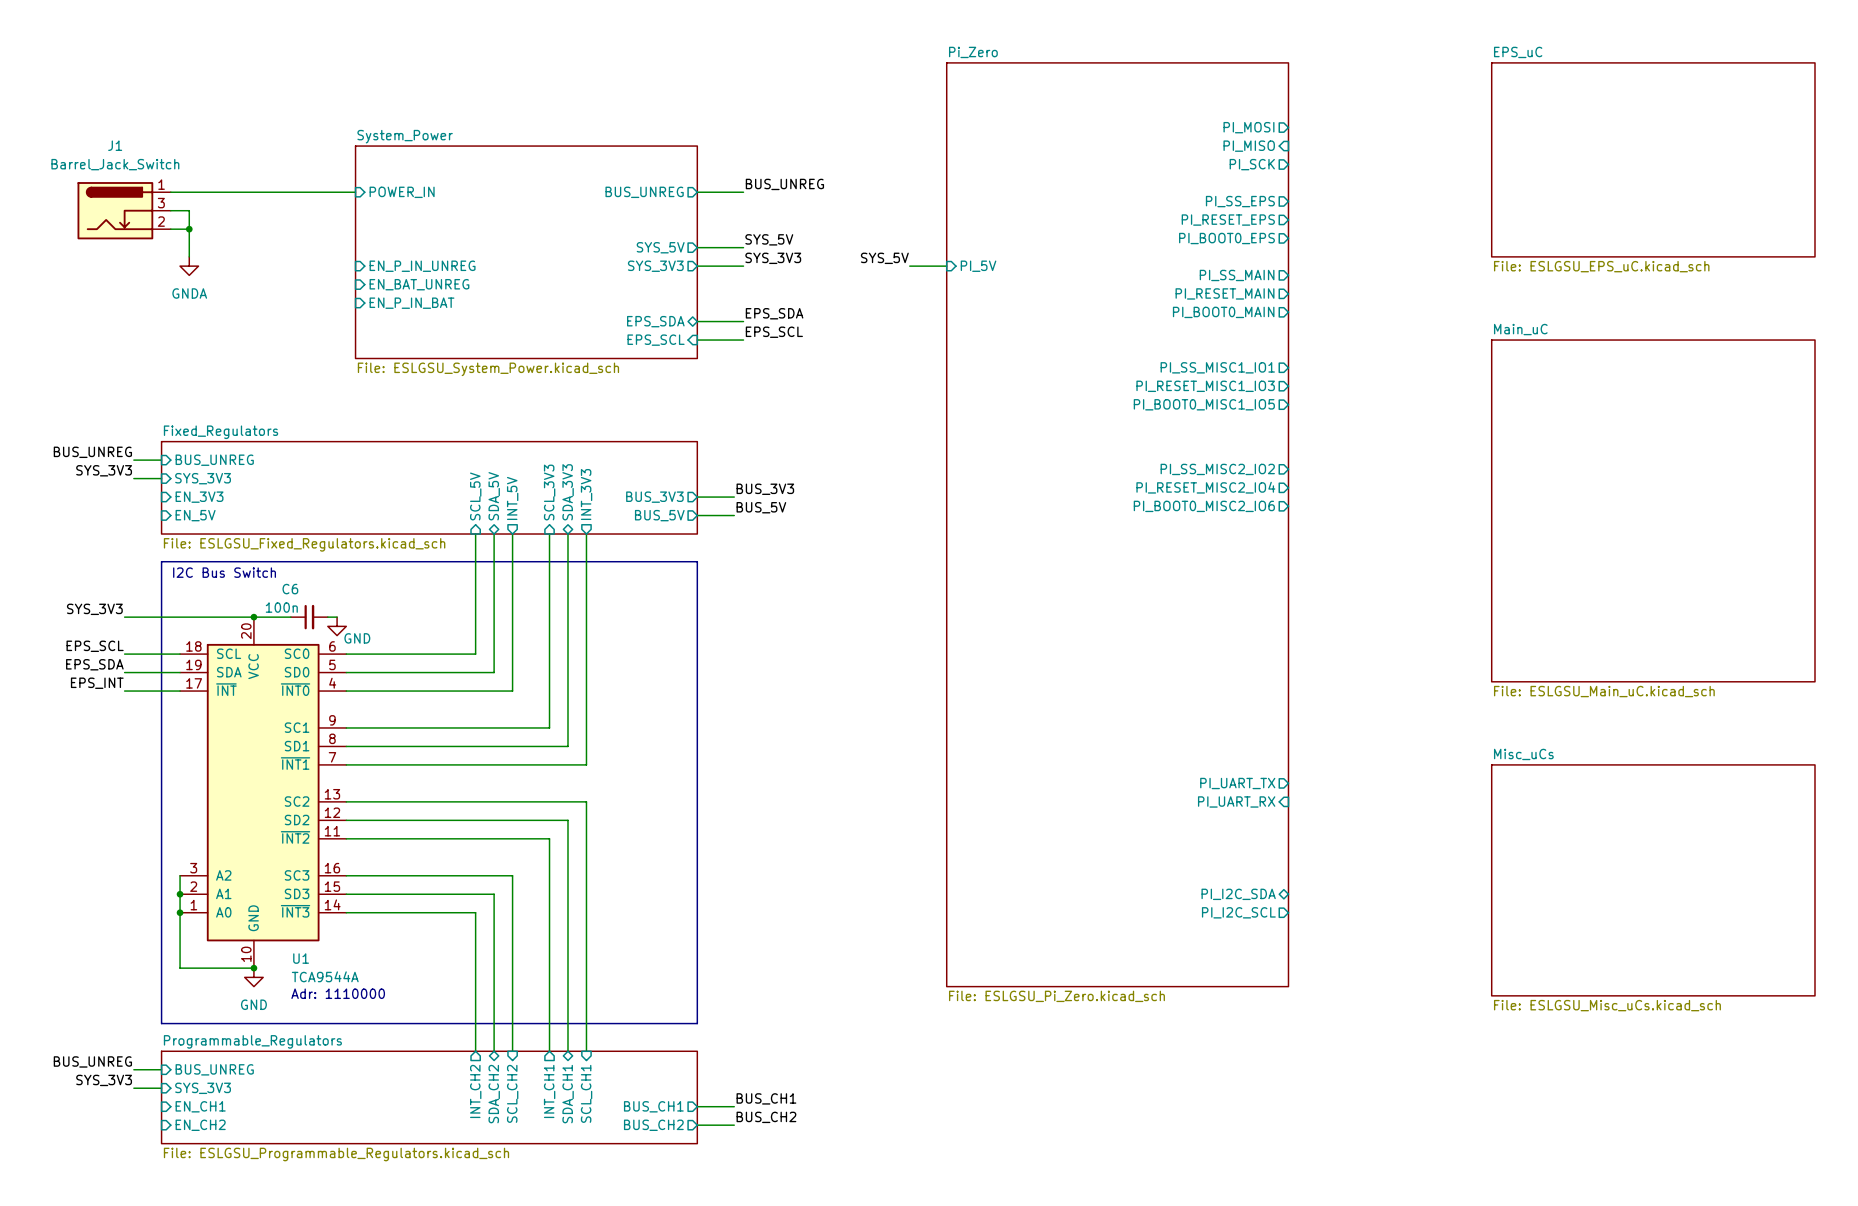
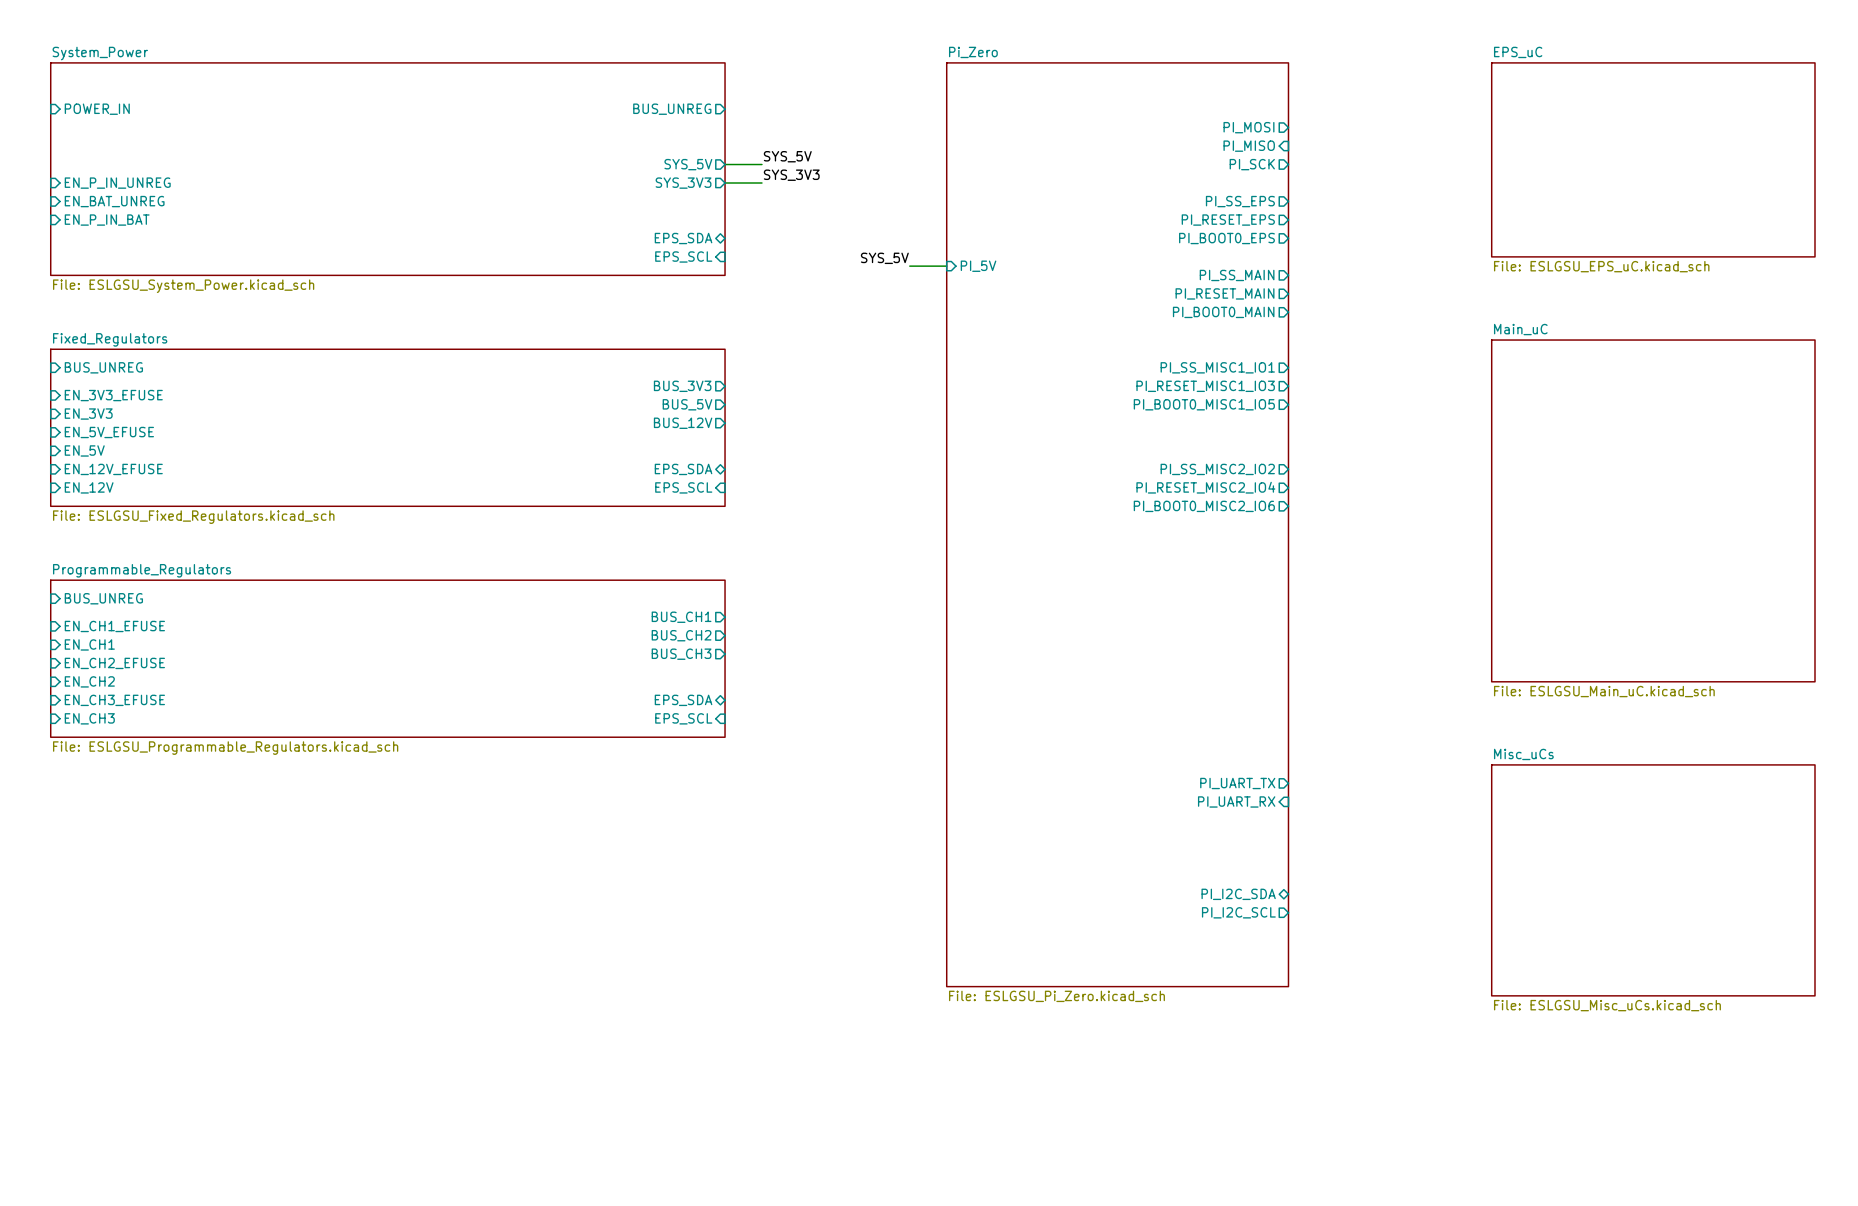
sheet pin: none -> POWER_IN (97, 109)
wire: none -> (725, 164) (761, 164)
sheet System_Power: none -> File: ESLGSU_System_Power.kicad_sch (387, 169)
wire: none -> (725, 182) (761, 182)
sheet pin: none -> EN_P_IN_UNREG (117, 183)
label: BUS_UNREG (784, 184) -> none
wire: (170, 192) (355, 192) -> none
sheet pin: POWER_IN (402, 192) -> none
sheet pin position: BUS_UNREG (644, 192) -> BUS_UNREG (672, 109)
wire: (697, 192) (743, 192) -> none
sheet pin: none -> EN_BAT_UNREG (114, 201)
J1: Barrel_Jack_Switch (124, 210) -> none
wire: (170, 210) (189, 210) (189, 256) -> none
sheet pin: none -> EN_P_IN_BAT (107, 220)
wire: (170, 229) (189, 229) -> none
junction: (189, 229) -> none
sheet pin: none -> EPS_SDA (683, 238)
label position: SYS_5V (769, 239) -> SYS_5V (787, 156)
sheet pin position: SYS_5V (660, 247) -> SYS_5V (688, 164)
wire: (697, 247) (743, 247) -> none
sheet System_Power: File: ESLGSU_System_Power.kicad_sch (526, 252) -> none
sheet pin: none -> EPS_SCL (683, 256)
label position: SYS_3V3 (773, 258) -> SYS_3V3 (791, 175)
power symbol: GNDA (189, 266) -> none
sheet pin: EN_P_IN_UNREG (422, 266) -> none
sheet pin position: SYS_3V3 (655, 266) -> SYS_3V3 (683, 183)
wire: (697, 266) (743, 266) -> none
sheet pin: EN_BAT_UNREG (419, 284) -> none
sheet pin: EN_P_IN_BAT (411, 303) -> none
label: EPS_SDA (774, 313) -> none
sheet pin: EPS_SDA (655, 321) -> none
wire: (697, 321) (743, 321) -> none
label: EPS_SCL (774, 332) -> none
sheet pin: EPS_SCL (656, 340) -> none
wire: (697, 340) (743, 340) -> none
sheet pin: none -> BUS_UNREG (103, 367)
sheet pin: none -> EN_3V3_EFUSE (113, 395)
sheet pin: none -> BUS_12V (683, 423)
sheet Fixed_Regulators: none -> File: ESLGSU_Fixed_Regulators.kicad_sch (387, 427)
sheet pin: none -> EN_5V_EFUSE (109, 432)
label: BUS_UNREG (92, 452) -> none
wire: (133, 460) (161, 460) -> none
sheet pin: BUS_UNREG (214, 460) -> none
sheet pin: none -> EN_12V_EFUSE (113, 469)
sheet pin: none -> EPS_SDA (683, 469)
label: SYS_3V3 (104, 470) -> none
wire: (133, 478) (161, 478) -> none
sheet pin: SYS_3V3 (203, 478) -> none
sheet pin: none -> EN_12V (89, 487)
sheet Fixed_Regulators: File: ESLGSU_Fixed_Regulators.kicad_sch (429, 487) -> none
sheet pin: none -> EPS_SCL (683, 487)
label: BUS_3V3 (765, 489) -> none
sheet pin: SCL_3V3 (549, 492) -> none
sheet pin: SDA_3V3 (568, 492) -> none
sheet pin: INT_3V3 (586, 494) -> none
sheet pin: SCL_5V (475, 496) -> none
sheet pin: SDA_5V (494, 496) -> none
sheet pin position: EN_3V3 (199, 497) -> EN_3V3 (88, 414)
sheet pin position: BUS_3V3 (654, 497) -> BUS_3V3 (682, 386)
wire: (697, 497) (734, 497) -> none
sheet pin: INT_5V (512, 498) -> none
label: BUS_5V (761, 507) -> none
sheet pin position: EN_5V (195, 515) -> EN_5V (84, 450)
sheet pin position: BUS_5V (659, 515) -> BUS_5V (687, 404)
wire: (697, 515) (734, 515) -> none
wire: (475, 534) (475, 654) (346, 654) -> none
wire: (494, 534) (494, 672) (346, 672) -> none
wire: (512, 534) (512, 691) (346, 691) -> none
wire: (549, 534) (549, 727) (346, 727) -> none
wire: (567, 534) (567, 746) (346, 746) -> none
wire: (586, 534) (586, 764) (346, 764) -> none
line: (161, 561) (697, 561) (697, 1023) (161, 1023) (161, 561) -> none
text: I2C Bus Switch (224, 572) -> none
sheet pin: none -> BUS_UNREG (103, 598)
label: SYS_3V3 (94, 609) -> none
wire: (124, 617) (290, 617) -> none
junction: (253, 617) -> none
C6: 100n (309, 617) -> none
wire: (327, 617) (337, 617) -> none
sheet pin: none -> BUS_CH1 (681, 617)
sheet pin: none -> EN_CH1_EFUSE (114, 626)
power symbol: GND (337, 626) -> none
sheet pin: none -> BUS_CH2 (681, 635)
sheet pin: none -> EN_CH1 (89, 644)
label: EPS_SCL (95, 646) -> none
wire: (124, 654) (180, 654) -> none
sheet pin: none -> BUS_CH3 (681, 654)
sheet Programmable_Regulators: none -> File: ESLGSU_Programmable_Regulators.kicad_sch (387, 658)
sheet pin: none -> EN_CH2_EFUSE (114, 663)
label: EPS_SDA (94, 664) -> none
wire: (124, 672) (180, 672) -> none
sheet pin: none -> EN_CH2 (89, 681)
label: EPS_INT (97, 683) -> none
wire: (124, 691) (180, 691) -> none
sheet pin: none -> EN_CH3_EFUSE (114, 700)
sheet pin: none -> EPS_SDA (683, 700)
sheet pin: none -> EN_CH3 (89, 718)
sheet pin: none -> EPS_SCL (683, 718)
U1: TCA9544A (263, 792) -> none
wire: (346, 801) (586, 801) (586, 1051) -> none
wire: (346, 820) (567, 820) (567, 1051) -> none
wire: (346, 838) (549, 838) (549, 1051) -> none
wire: (180, 875) (180, 968) (253, 968) -> none
wire: (346, 875) (512, 875) (512, 1051) -> none
junction: (180, 894) -> none
wire: (346, 894) (494, 894) (494, 1051) -> none
junction: (180, 912) -> none
wire: (346, 912) (475, 912) (475, 1051) -> none
junction: (253, 968) -> none
power symbol: GND (253, 977) -> none
text: Adr: 1110000 (338, 993) -> none
label: BUS_UNREG (92, 1061) -> none
wire: (133, 1069) (161, 1069) -> none
sheet pin: BUS_UNREG (214, 1069) -> none
label: SYS_3V3 (104, 1080) -> none
wire: (133, 1088) (161, 1088) -> none
sheet pin: SYS_3V3 (203, 1088) -> none
sheet pin: INT_CH2 (475, 1091) -> none
sheet pin: INT_CH1 (549, 1091) -> none
sheet pin: SCL_CH2 (512, 1093) -> none
sheet pin: SCL_CH1 (586, 1093) -> none
sheet pin: SDA_CH2 (494, 1094) -> none
sheet pin: SDA_CH1 (568, 1094) -> none
sheet Programmable_Regulators: File: ESLGSU_Programmable_Regulators.kicad_sch (429, 1097) -> none
label: BUS_CH1 (766, 1098) -> none
sheet pin: EN_CH1 (200, 1106) -> none
sheet pin: BUS_CH1 (653, 1106) -> none
wire: (697, 1106) (734, 1106) -> none
label: BUS_CH2 (766, 1117) -> none
sheet pin: EN_CH2 (200, 1125) -> none
sheet pin: BUS_CH2 (653, 1125) -> none
wire: (697, 1125) (734, 1125) -> none

